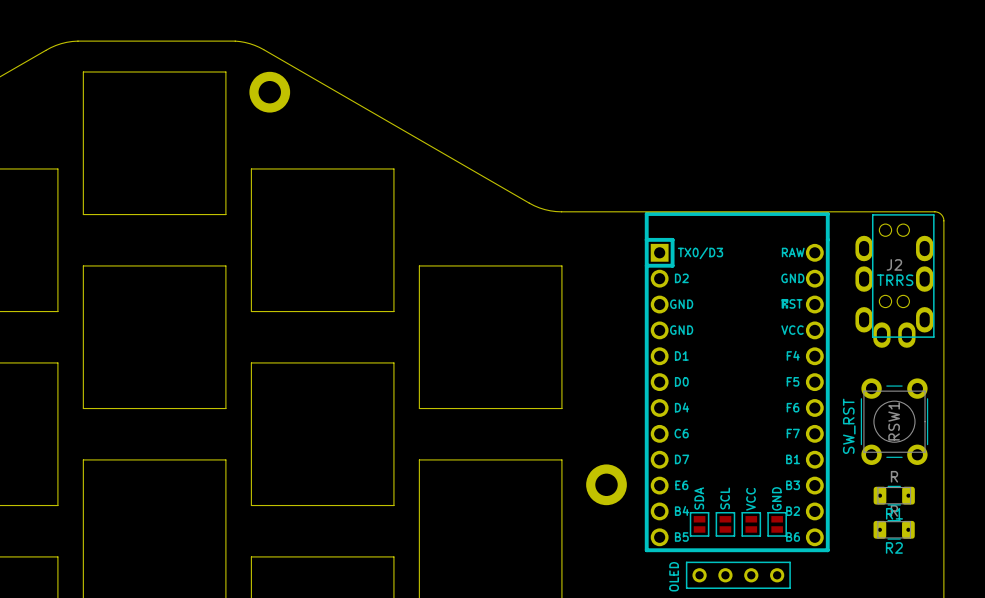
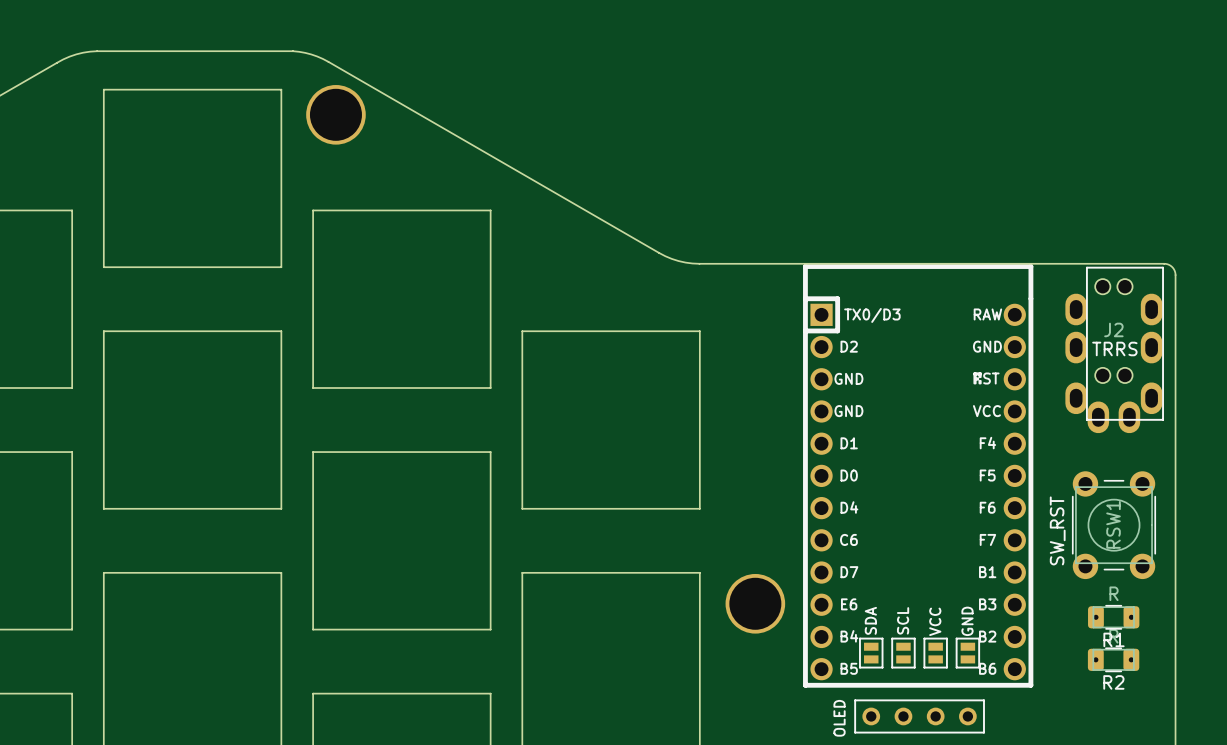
part footprint: [249, 71, 291, 113] -> [306, 85, 366, 145]
part footprint: [586, 464, 627, 506] -> [725, 573, 786, 634]

